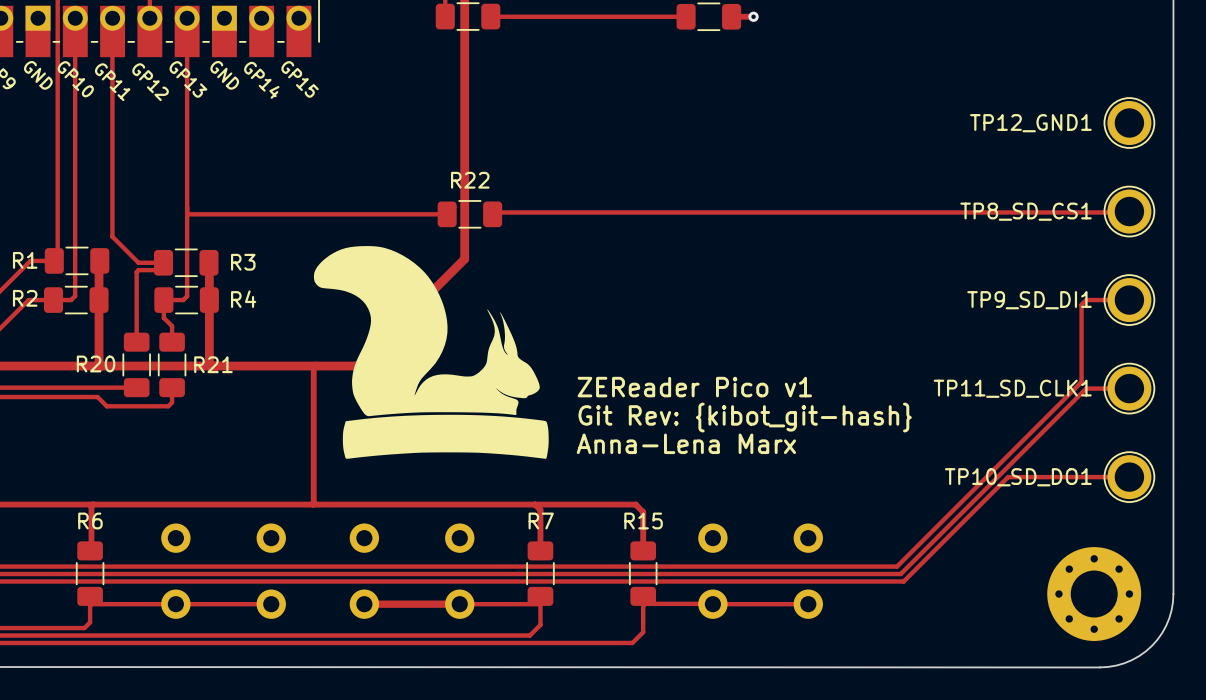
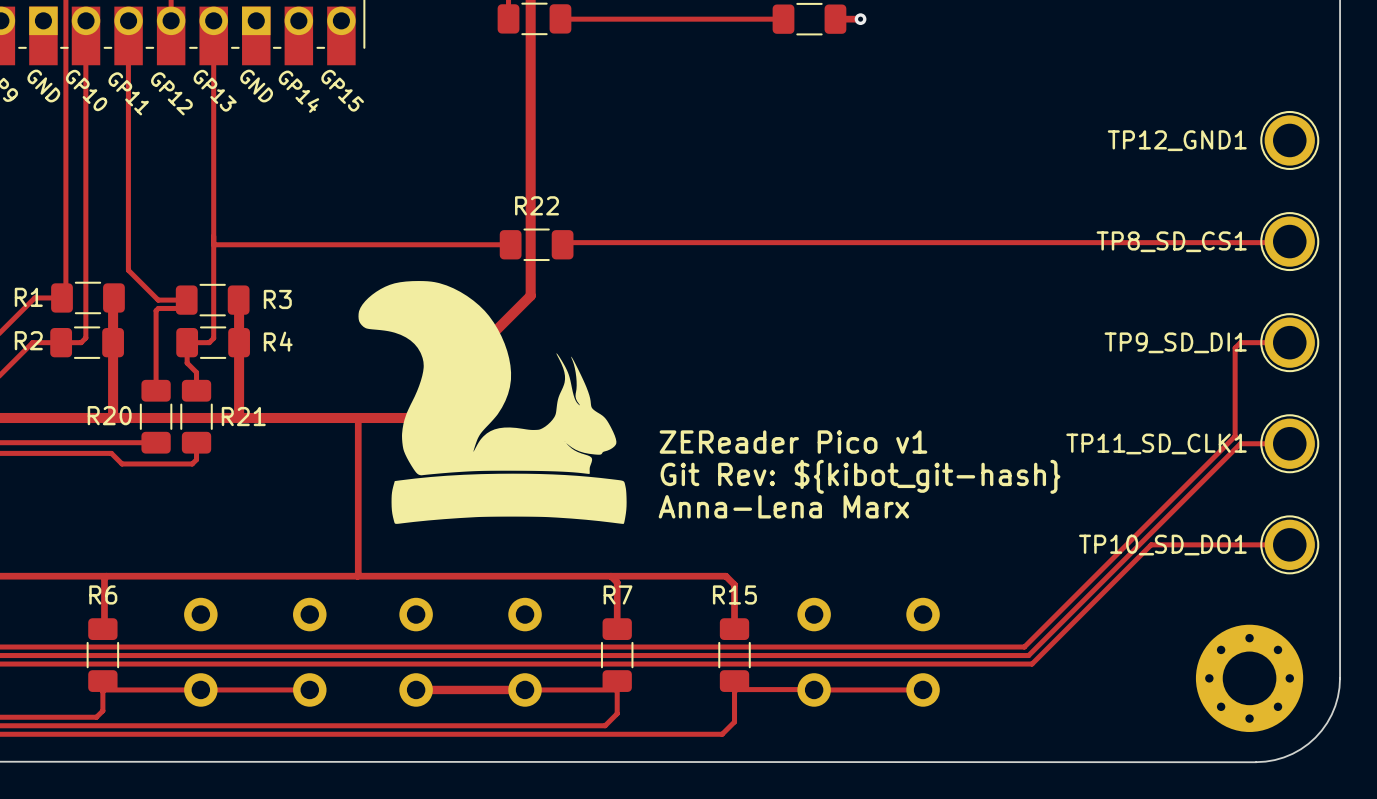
text: Git Rev: {kibot_git-hash} (745, 417) -> Git Rev: ${kibot_git-hash} (860, 476)

